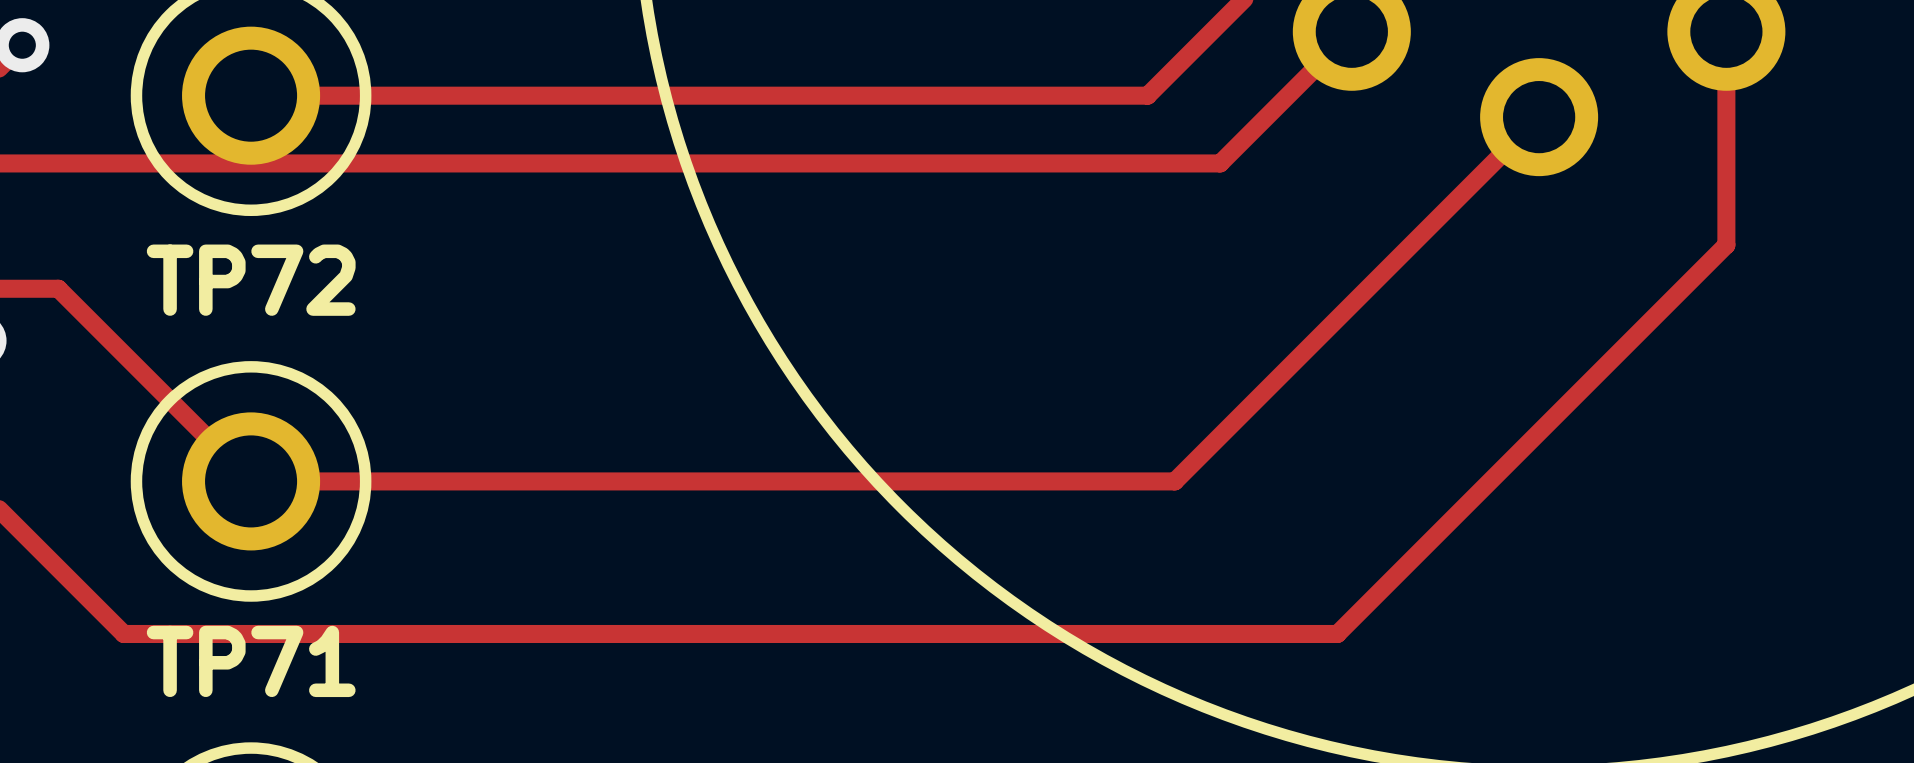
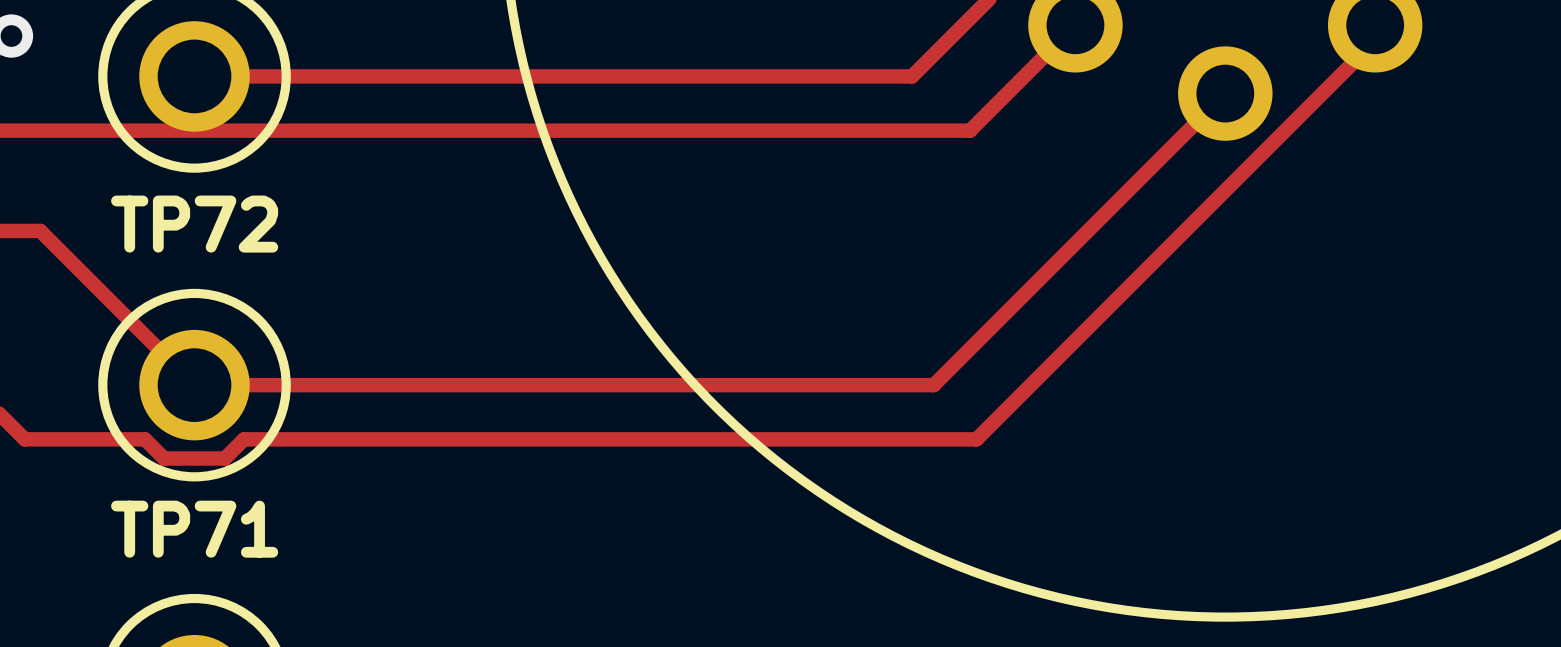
top track: (1726, 51) (1726, 245) (1337, 633) (123, 633) (39, 549) -> (1375, 40) (976, 439) (244, 439) (224, 458) (164, 458) (144, 439) (24, 439)

